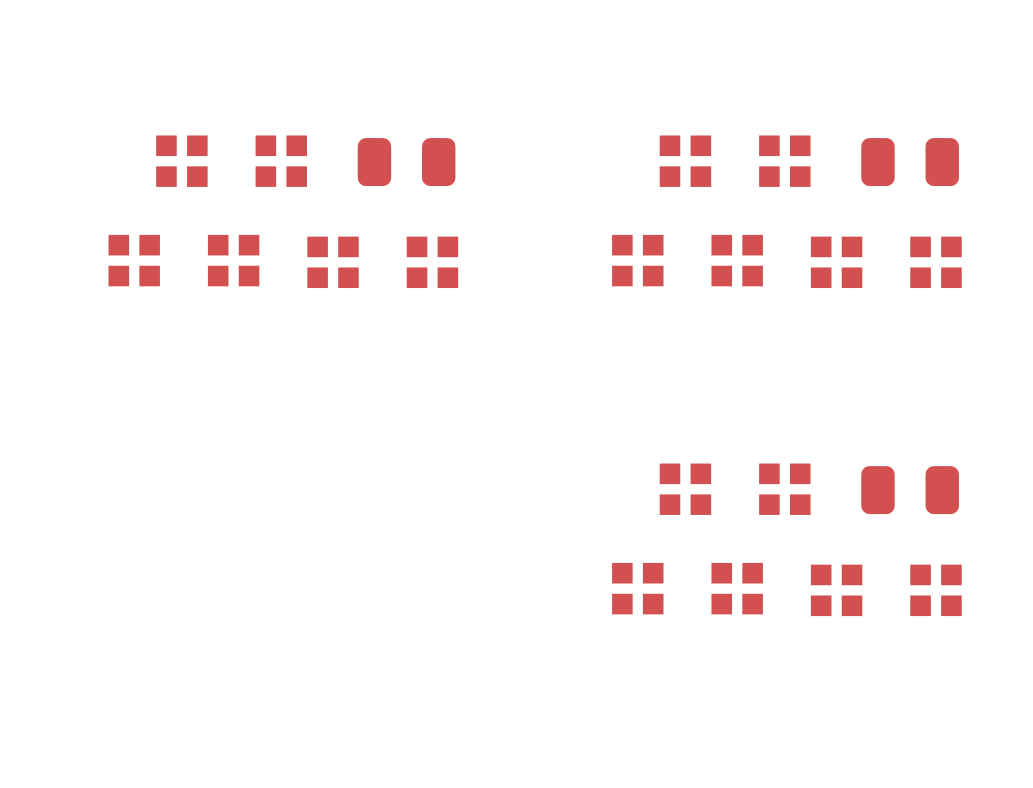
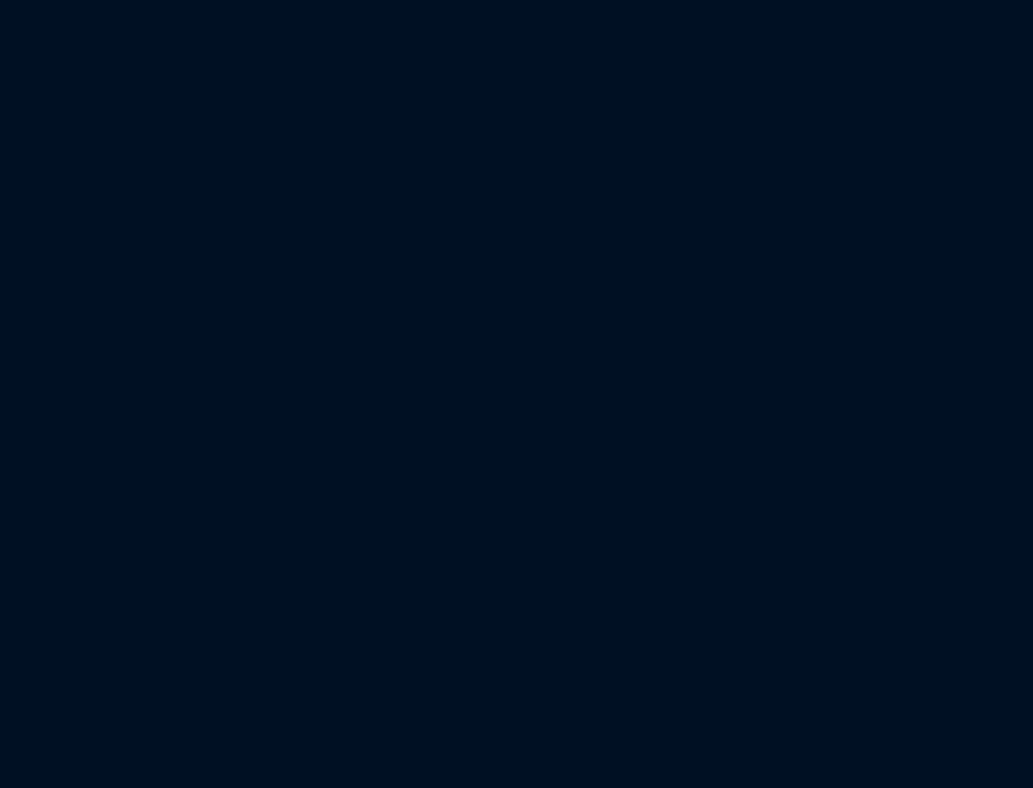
part: (181, 161) -> none
part: (281, 161) -> none
part: (685, 161) -> none
part: (784, 161) -> none
part: (406, 162) -> none
part: (910, 162) -> none
part: (134, 260) -> none
part: (233, 260) -> none
part: (637, 260) -> none
part: (737, 260) -> none
part: (333, 262) -> none
part: (432, 262) -> none
part: (836, 262) -> none
part: (935, 262) -> none
part: (685, 489) -> none
part: (784, 489) -> none
part: (910, 490) -> none
part: (637, 588) -> none
part: (737, 588) -> none
part: (836, 590) -> none
part: (935, 590) -> none

